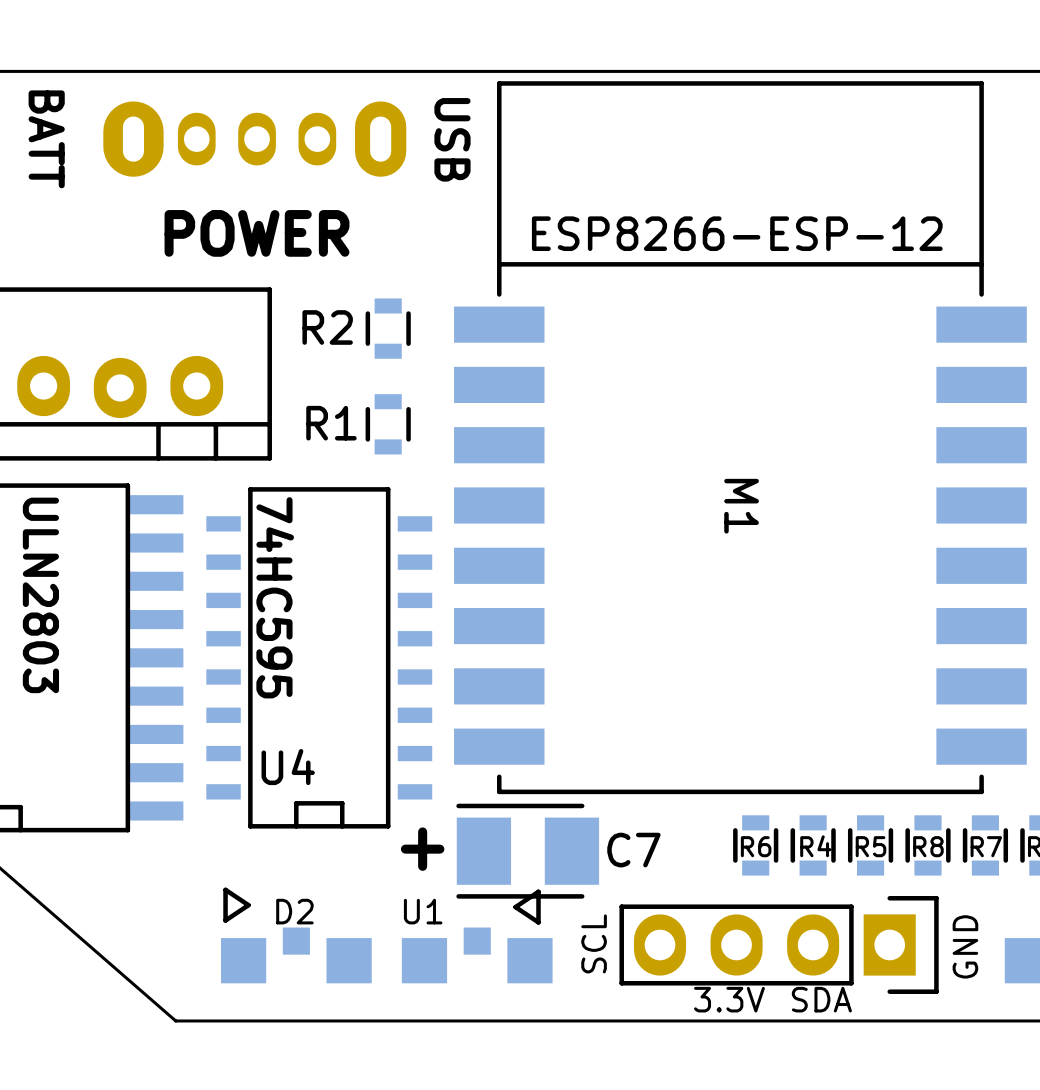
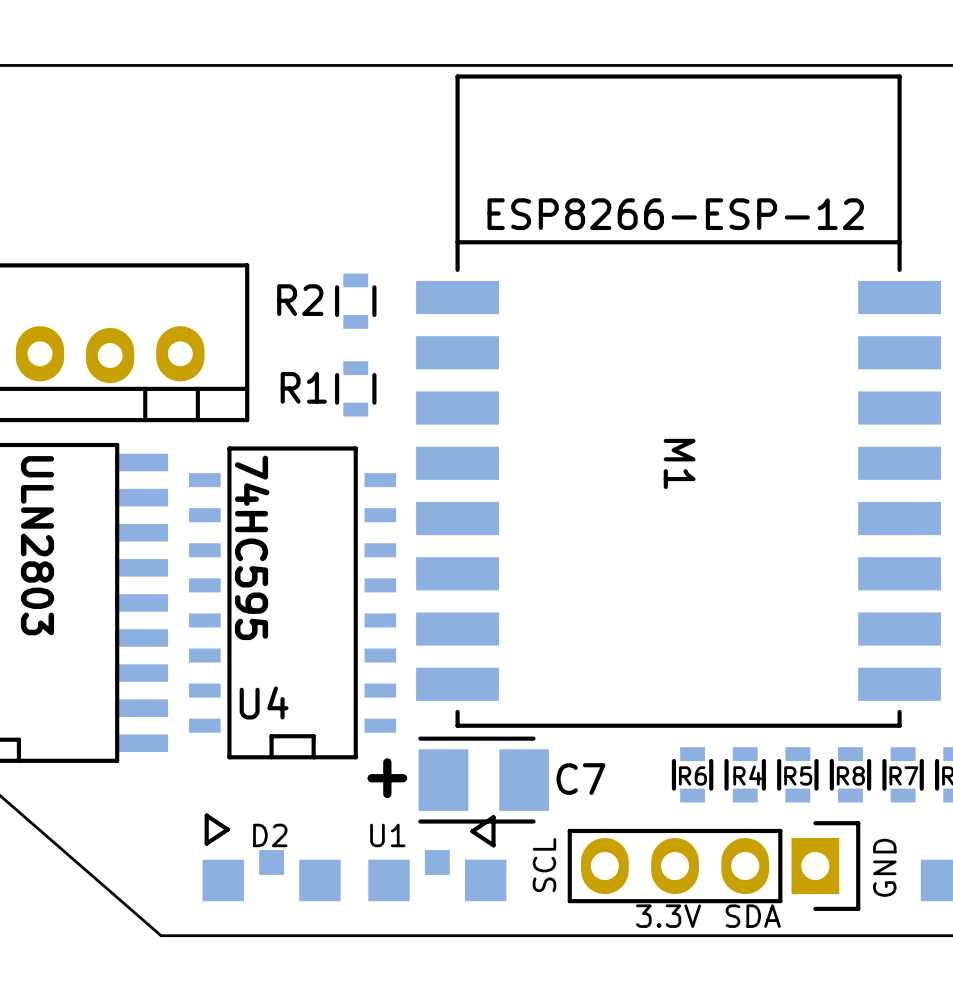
text: BATT (46, 139) -> none
part: (254, 139) -> none
text: USB (452, 139) -> none
text: POWER (257, 233) -> none

